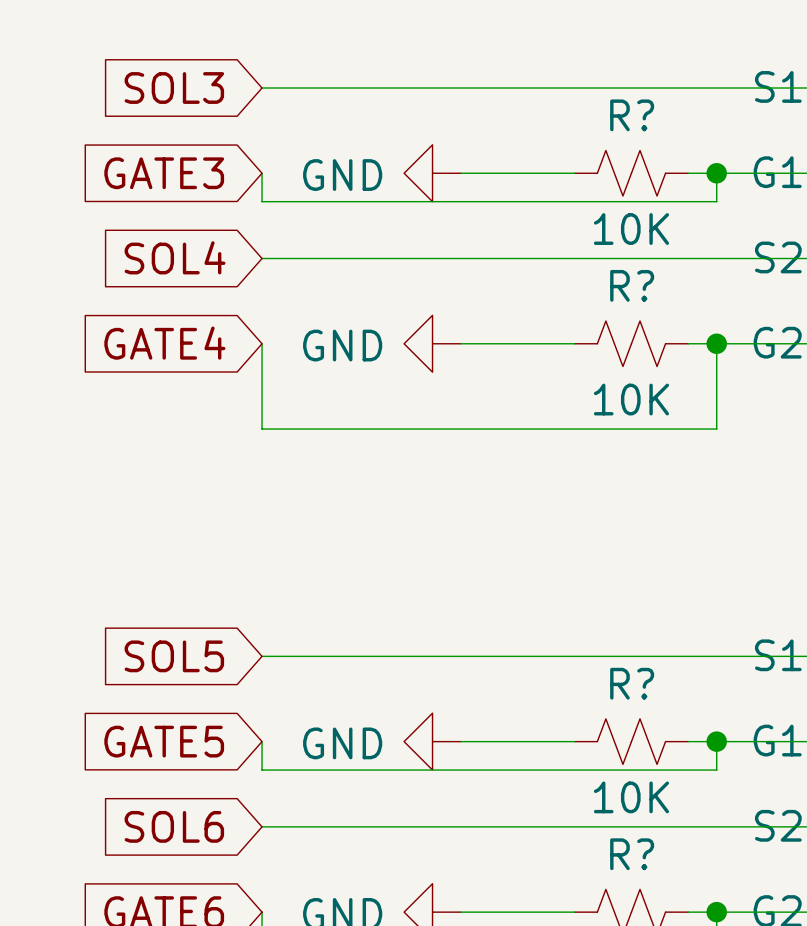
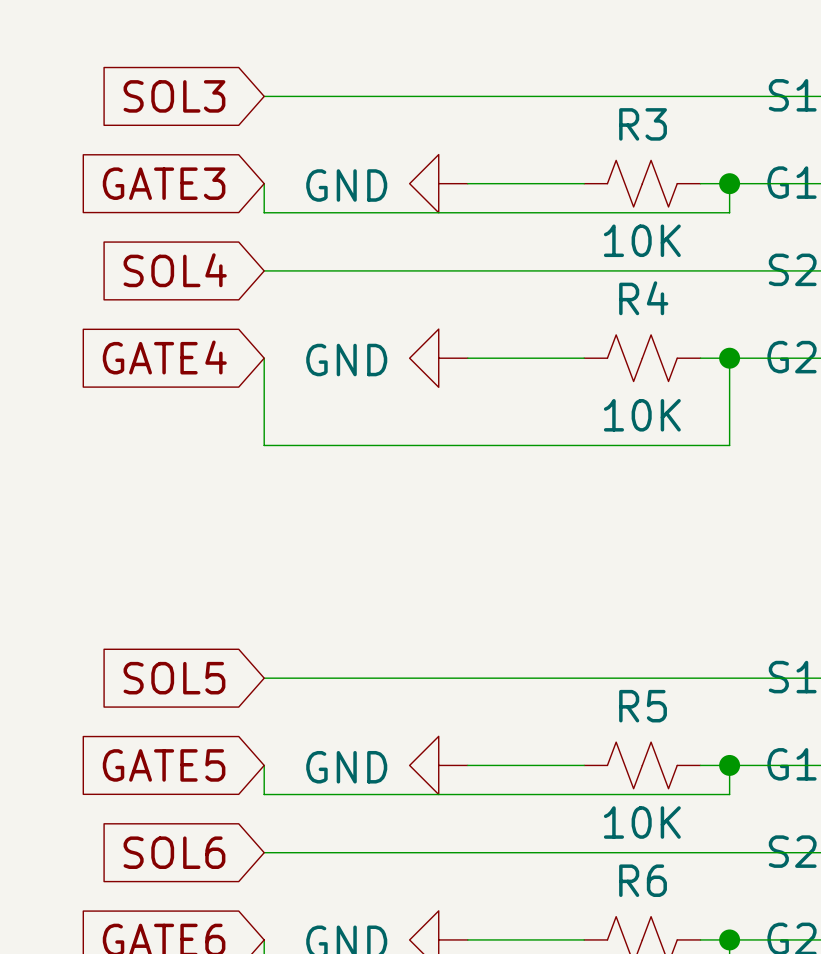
R? name: R? (632, 115) -> R3 (643, 124)
R? name: R? (632, 285) -> R4 (643, 298)
R? name: R? (632, 683) -> R5 (643, 706)
R? name: R? (632, 854) -> R6 (643, 880)

